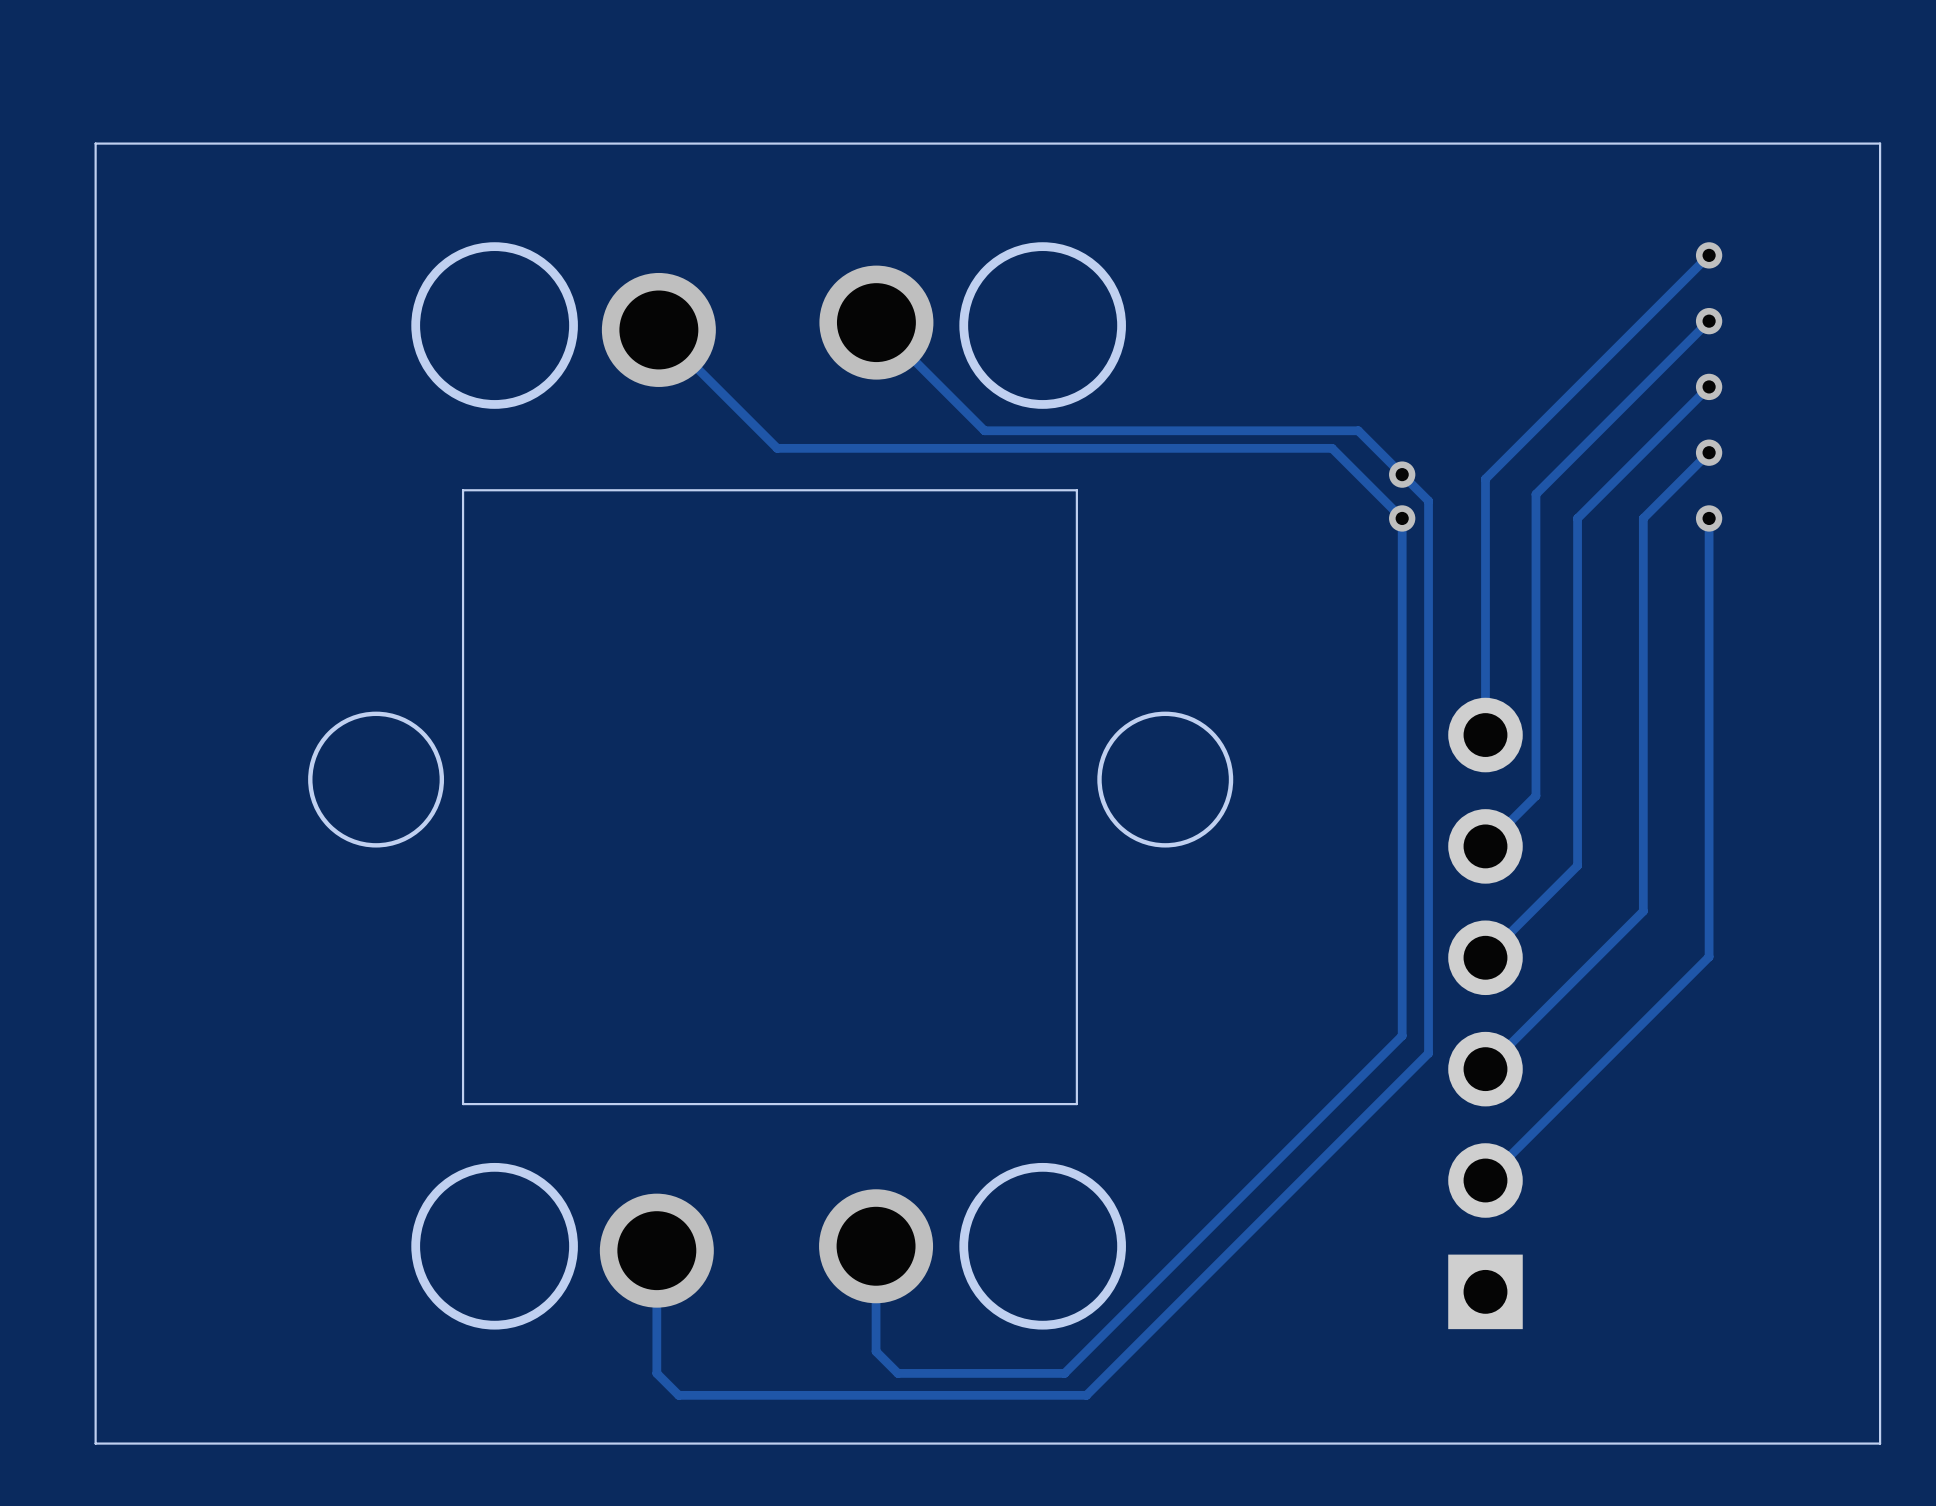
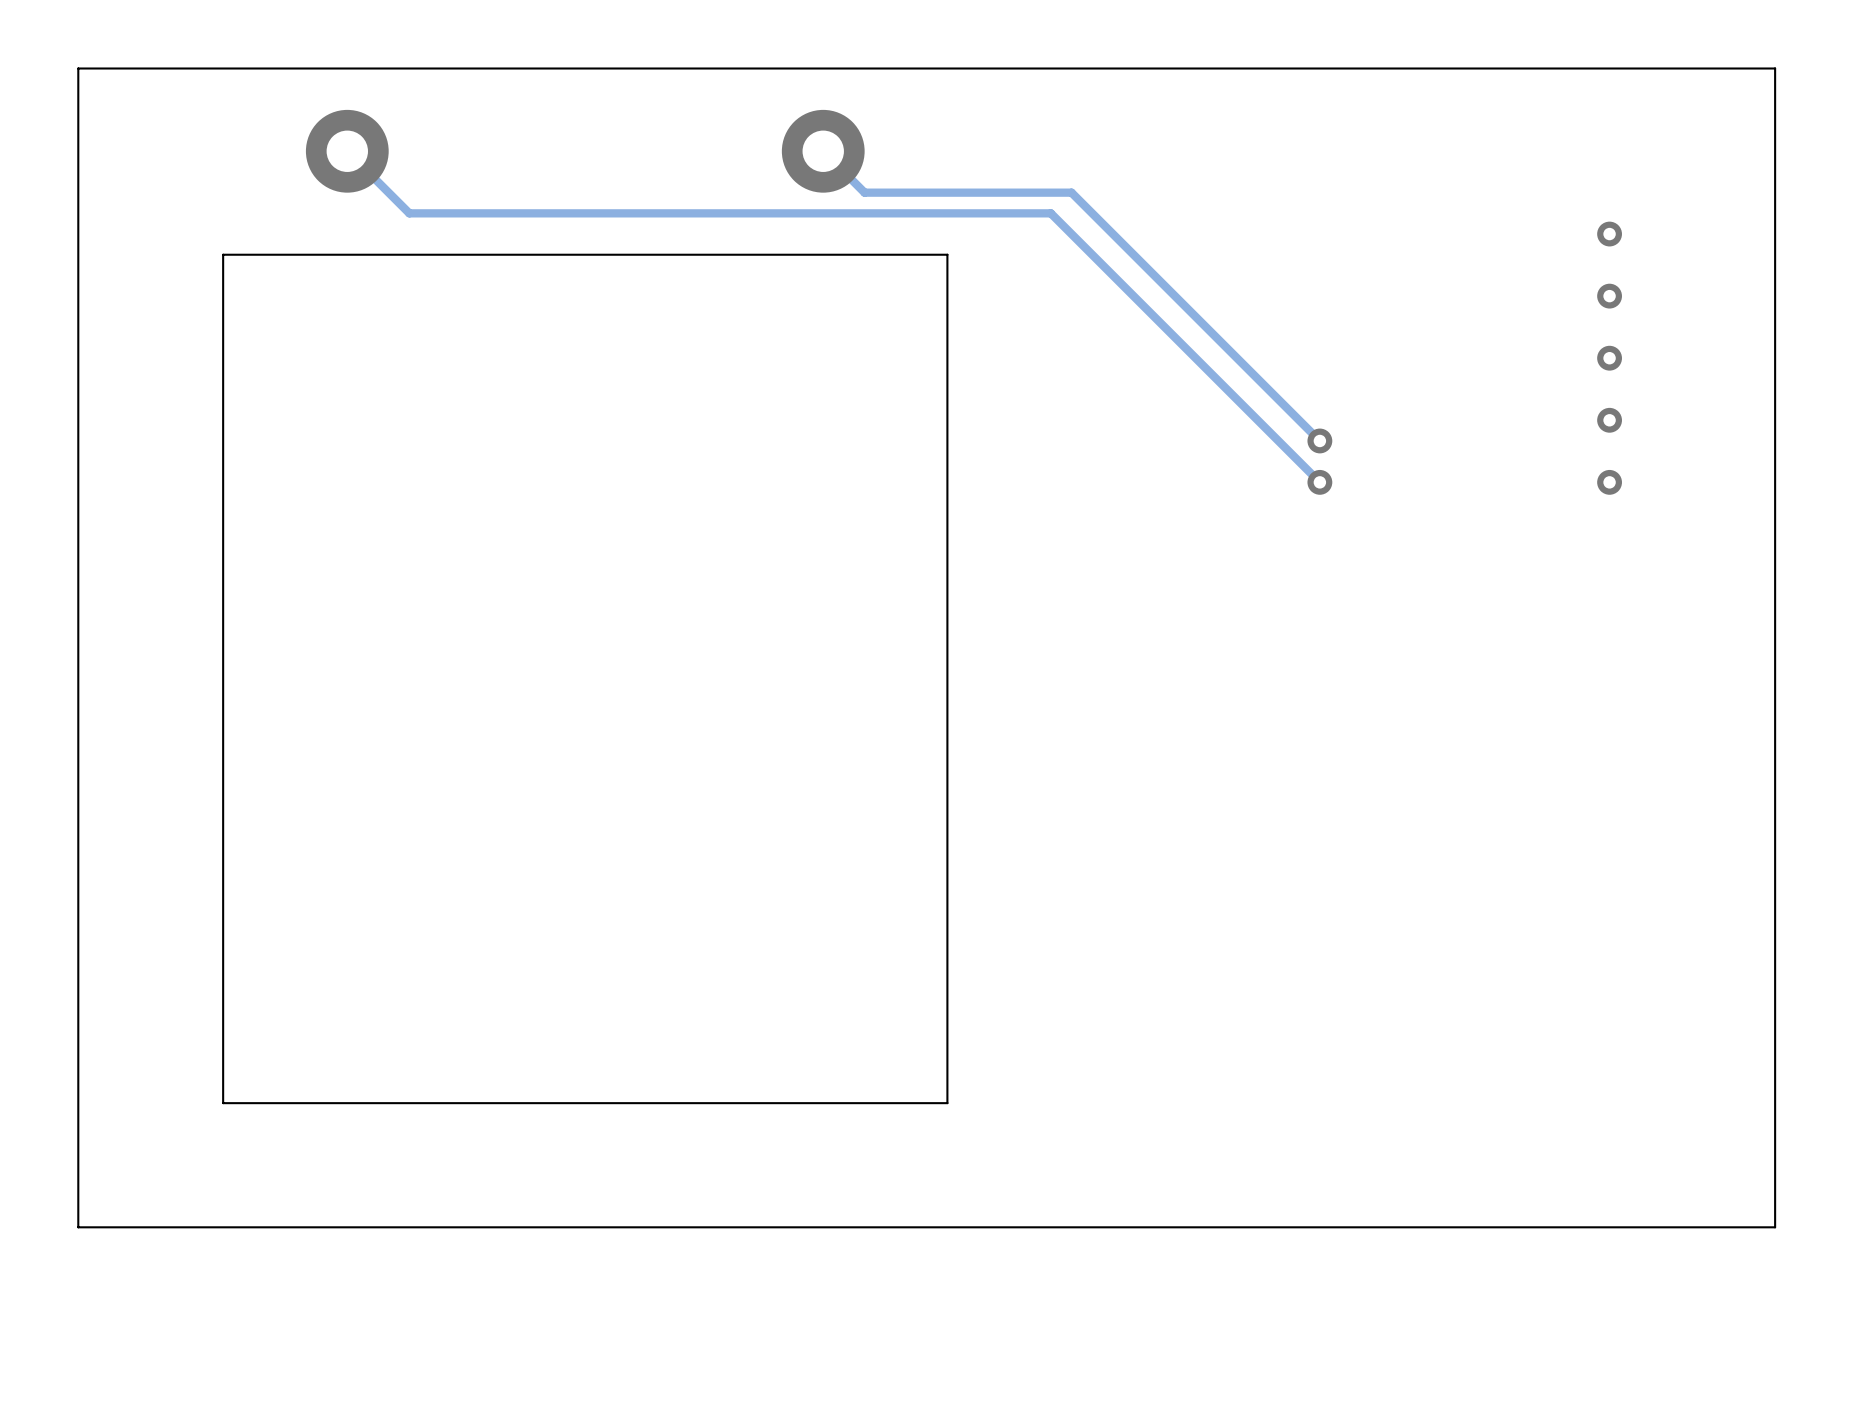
board edge: (1880, 143) (95, 143) (95, 1443) (1880, 1443) (1880, 143) -> (1775, 68) (1775, 1227) (78, 1227) (78, 68) (1775, 68)
via: none -> (347, 151)
via: none -> (823, 151)
round board edge: [411, 242, 578, 409] -> none
round board edge: [959, 242, 1126, 409] -> none
track: (1709, 255) (1485, 478) (1485, 735) -> none
board edge: none -> (947, 254) (223, 254) (223, 1103) (947, 1103) (947, 254)
track: (1709, 321) (1535, 494) (1535, 795) (1485, 846) -> none
track: (876, 322) (984, 430) (1358, 430) -> (823, 151) (864, 192) (1071, 192) (1278, 399)
via: (876, 322) -> none
track: (658, 329) (777, 448) (1332, 448) -> (347, 151) (409, 213) (1050, 213) (1253, 416)
via: (658, 329) -> none
track: (1709, 386) (1577, 518) (1577, 865) (1485, 957) -> none
track: (1709, 452) (1643, 518) (1643, 911) (1485, 1069) -> none
track: (1402, 474) (1428, 500) (1428, 1053) (1086, 1395) (678, 1395) (656, 1373) (656, 1250) -> none
board edge: (1076, 490) (463, 490) (463, 1104) (1076, 1104) (1076, 490) -> none
track: (1402, 518) (1402, 1035) (1064, 1373) (897, 1373) (876, 1351) (876, 1246) -> none
track: (1709, 518) (1709, 956) (1485, 1180) -> none
round board edge: [308, 711, 445, 848] -> none
round board edge: [1097, 711, 1234, 848] -> none
part: (1485, 1013) -> none
round board edge: [411, 1162, 578, 1330] -> none
round board edge: [959, 1162, 1126, 1330] -> none
via: (876, 1246) -> none
via: (656, 1250) -> none

